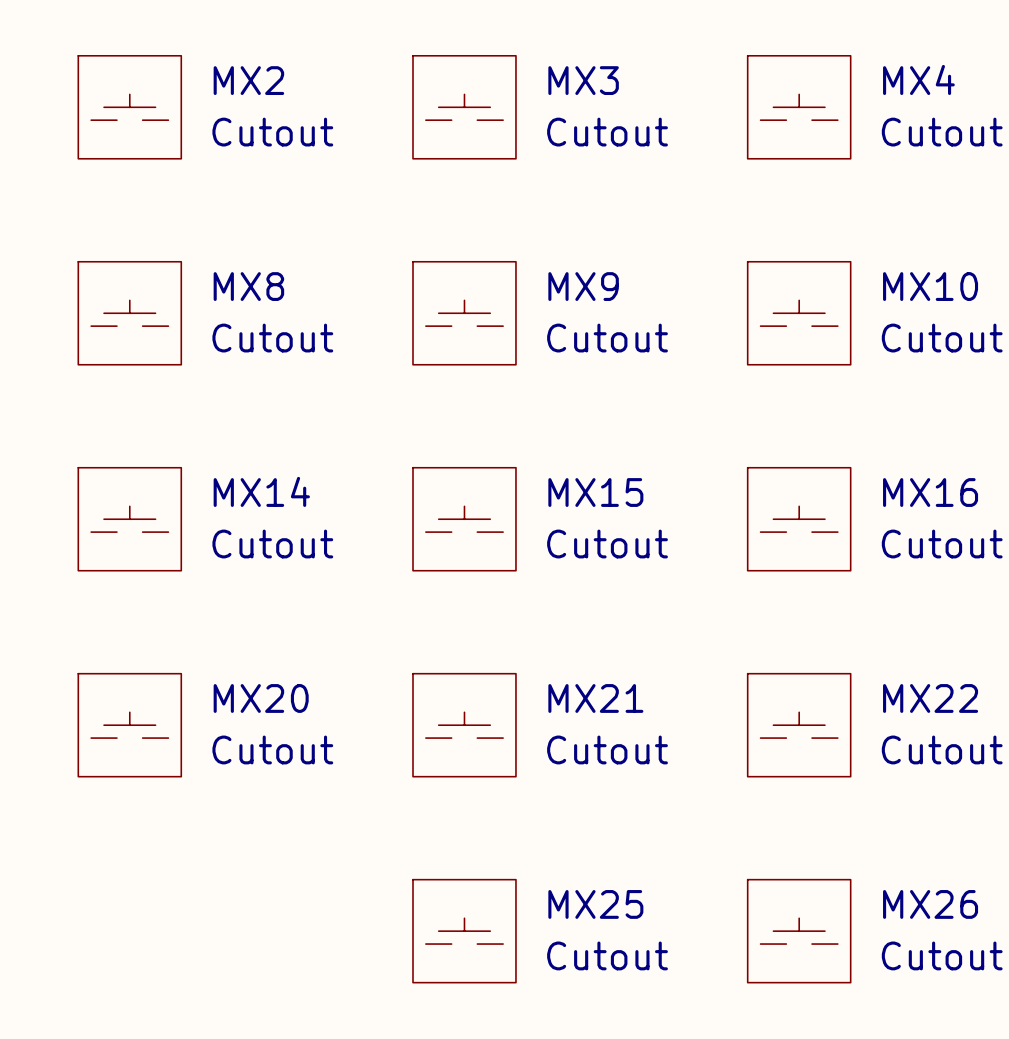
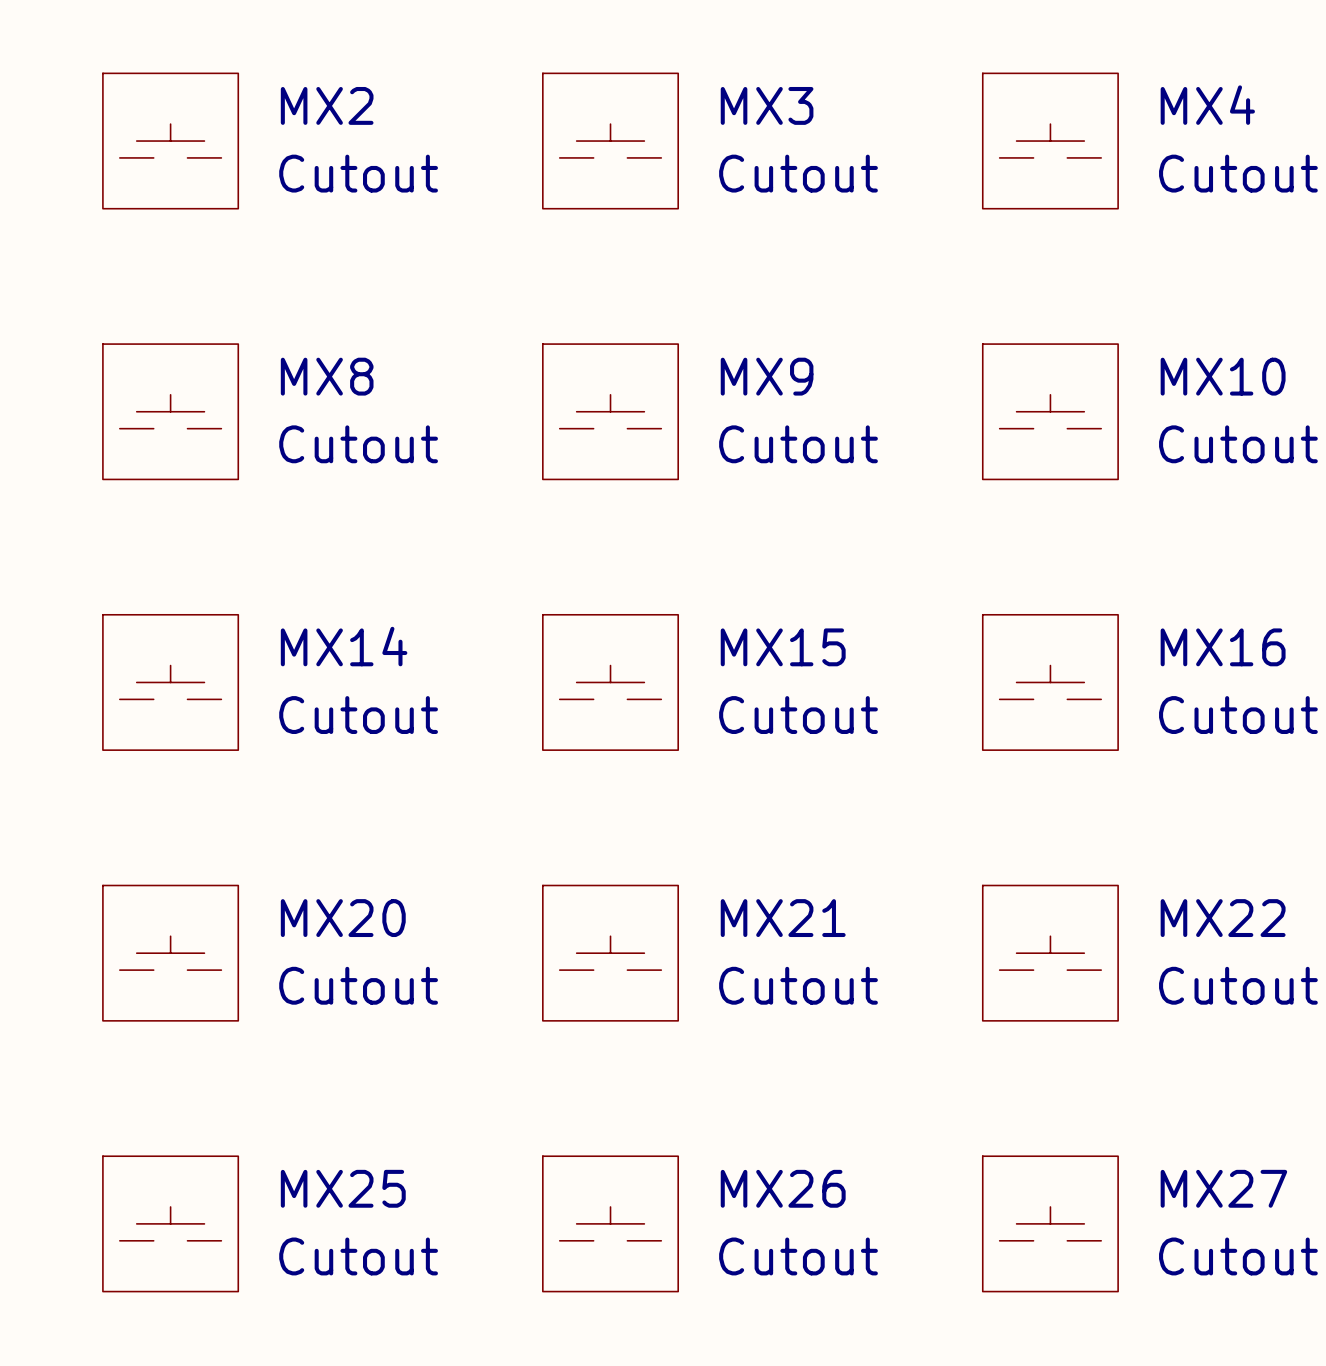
MX25 name: MX25 (595, 904) -> MX26 (783, 1188)
MX26 name: MX26 (930, 904) -> MX27 (1223, 1188)
MX25: none -> Cutout (170, 1223)

